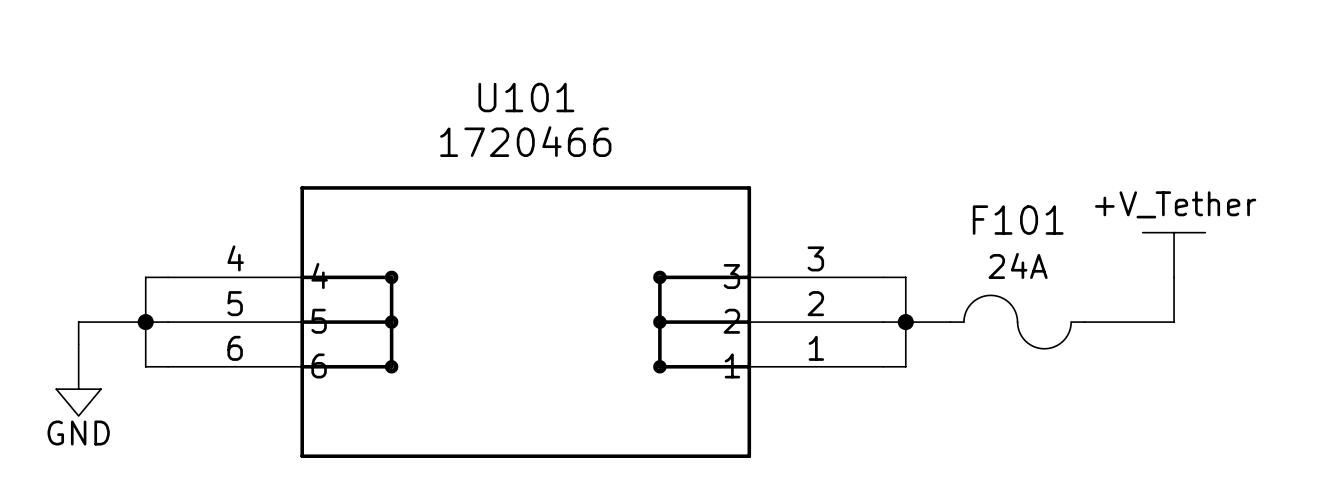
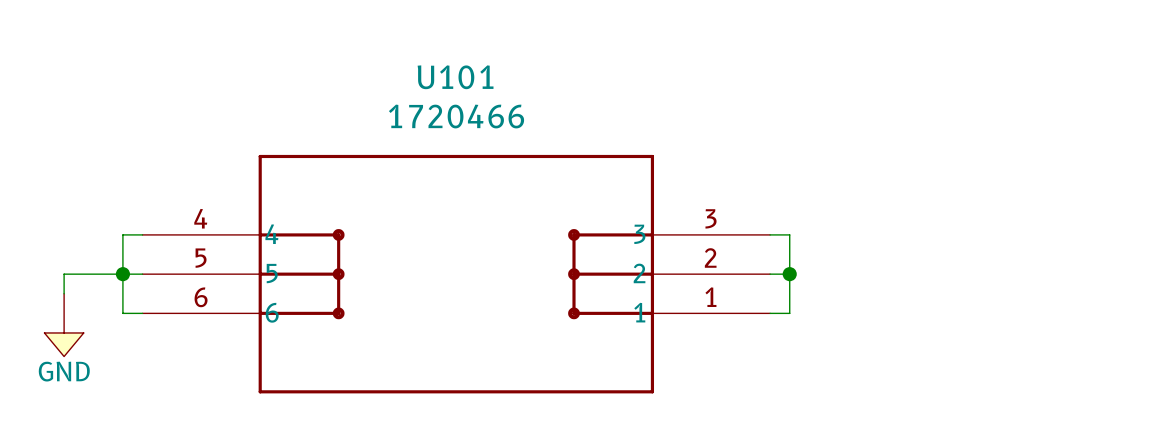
power symbol: +V_Tether (1174, 255) -> none
wire: (1174, 277) (1174, 322) (1084, 322) -> none
wire: (905, 322) (950, 322) -> none
F101: (1017, 322) -> none

